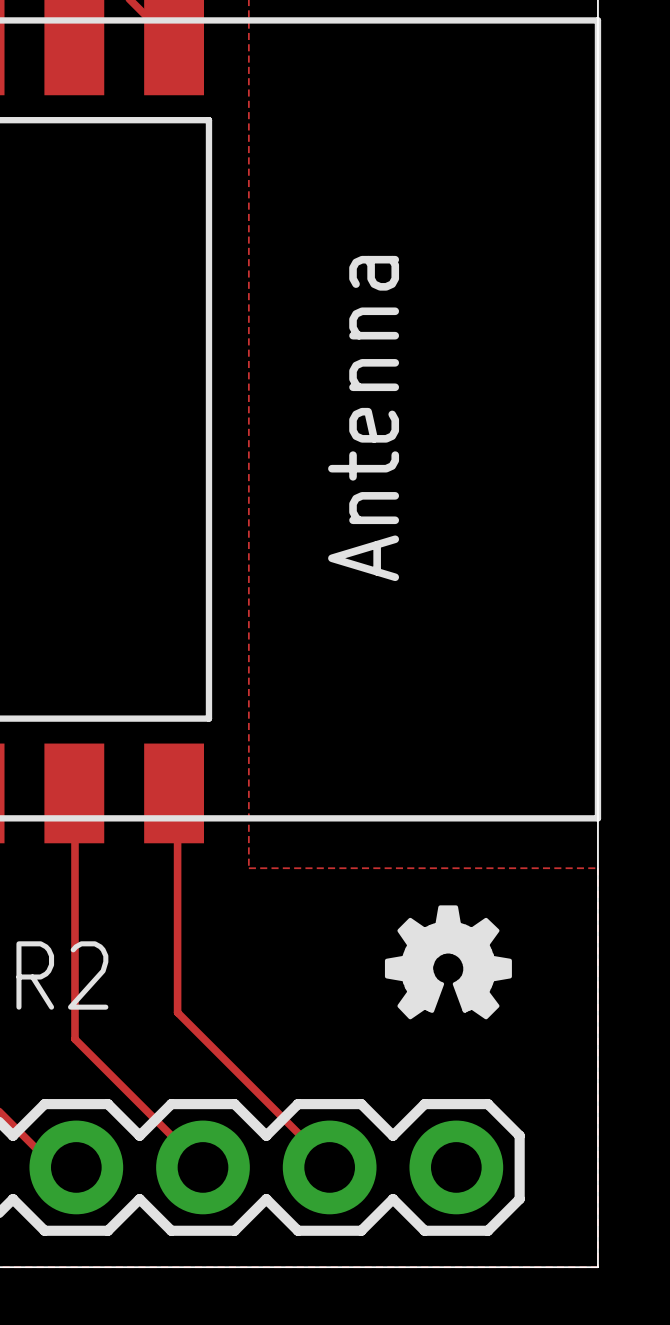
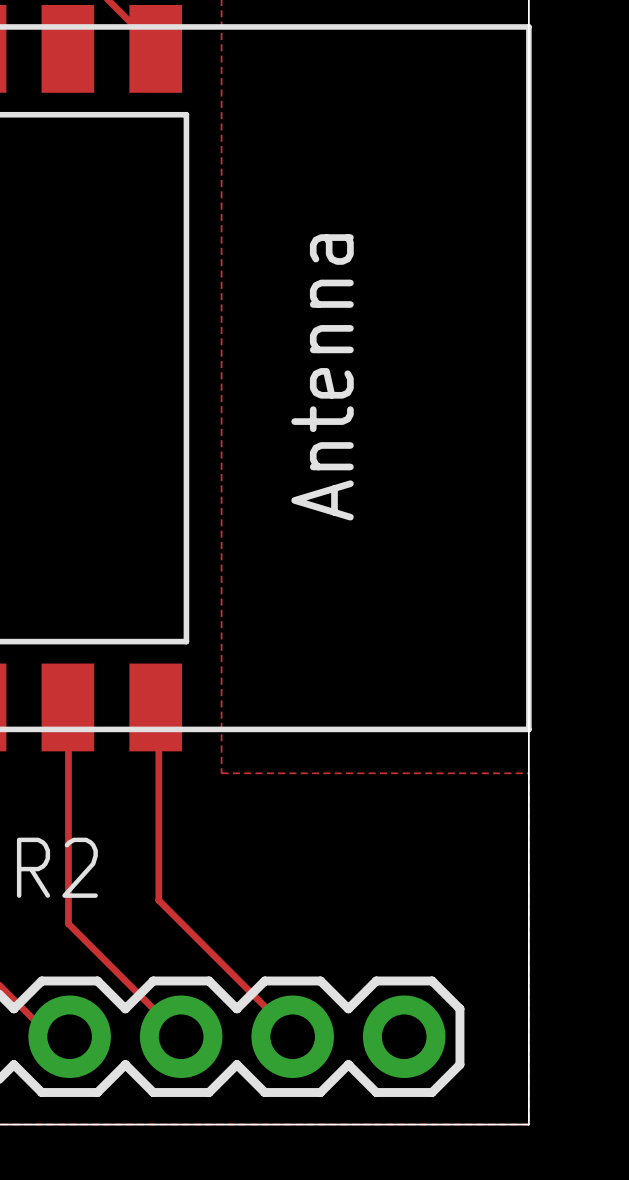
drawing: [384, 905, 512, 1020] -> none

